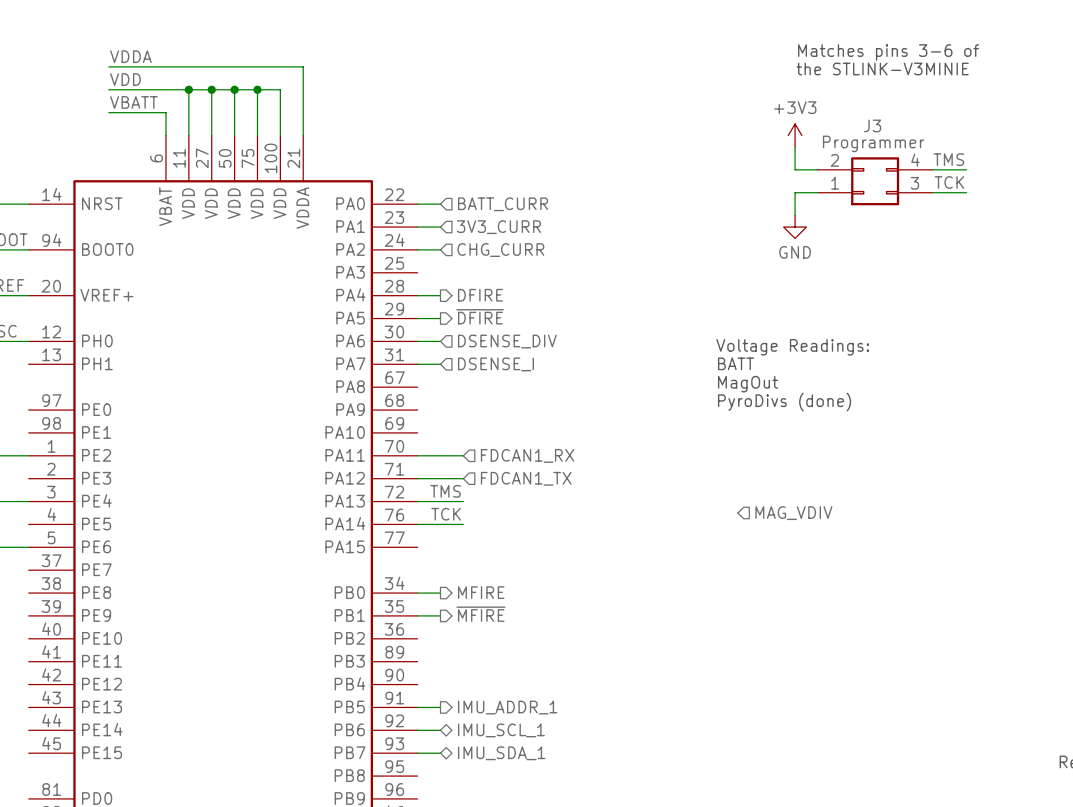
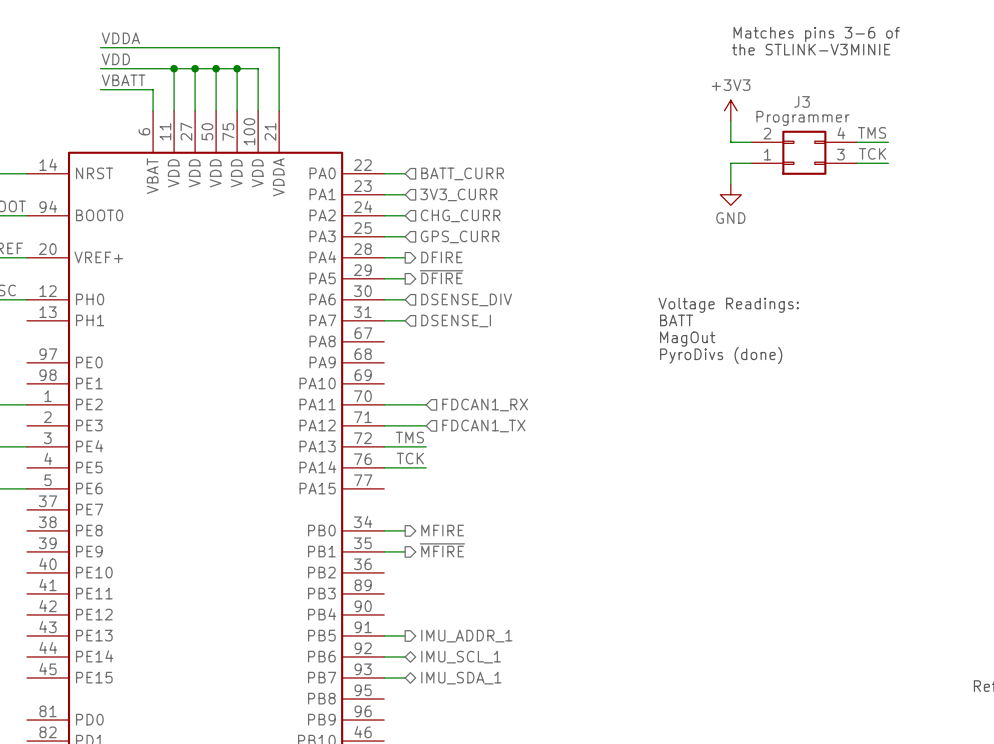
wire: none -> (384, 236) (405, 236)
hierarchical label: none -> GPS_CURR (460, 236)
hierarchical label: MAG_VDIV (793, 513) -> none

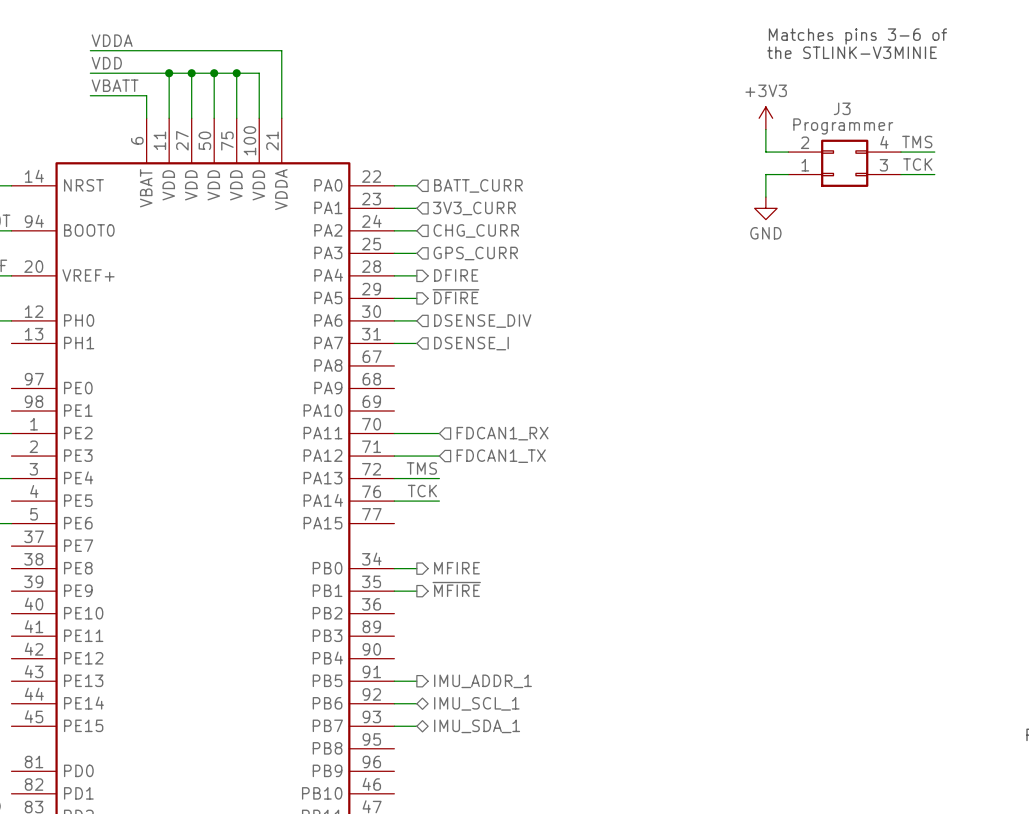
text: Voltage Readings: (728, 305) -> none
text: BATT (676, 320) -> none
text: MagOut (687, 339) -> none
text: PyroDivs (done) (721, 355) -> none

